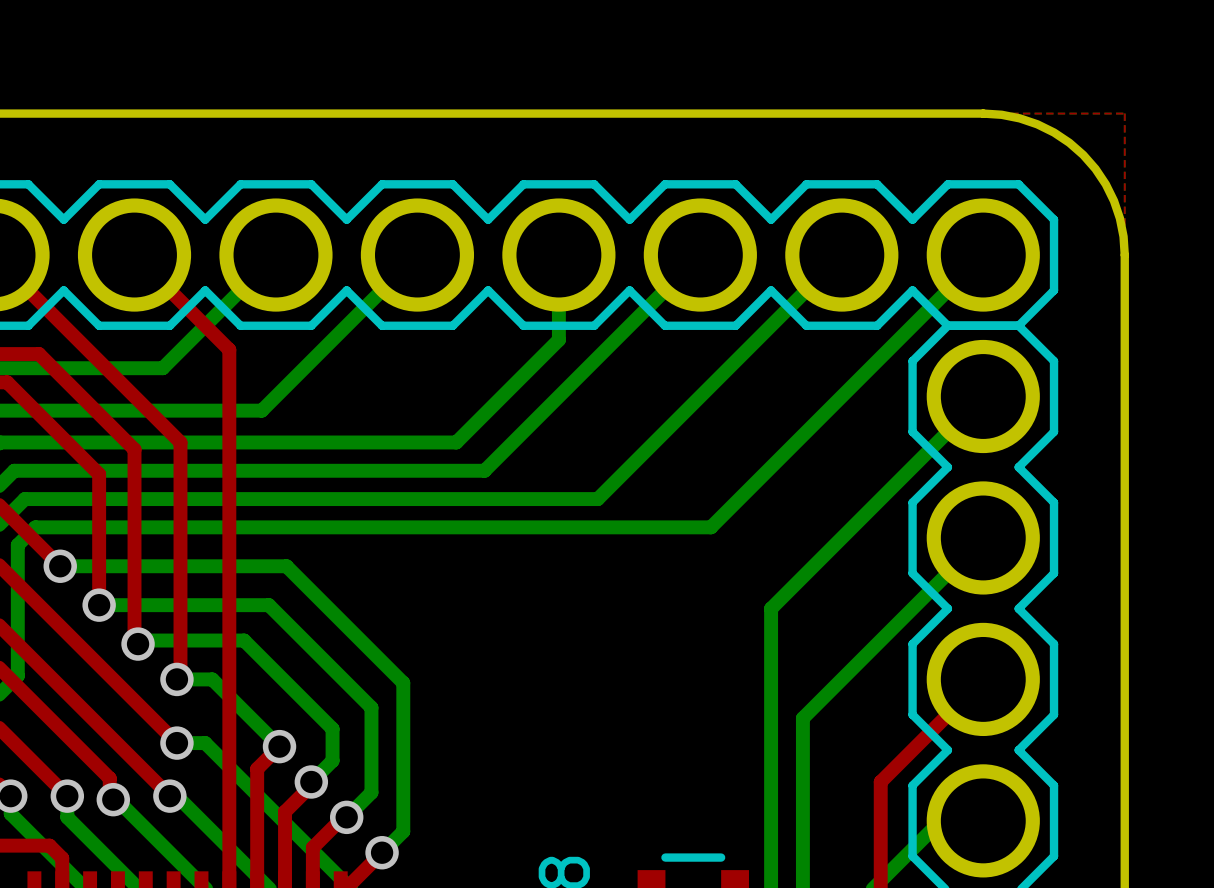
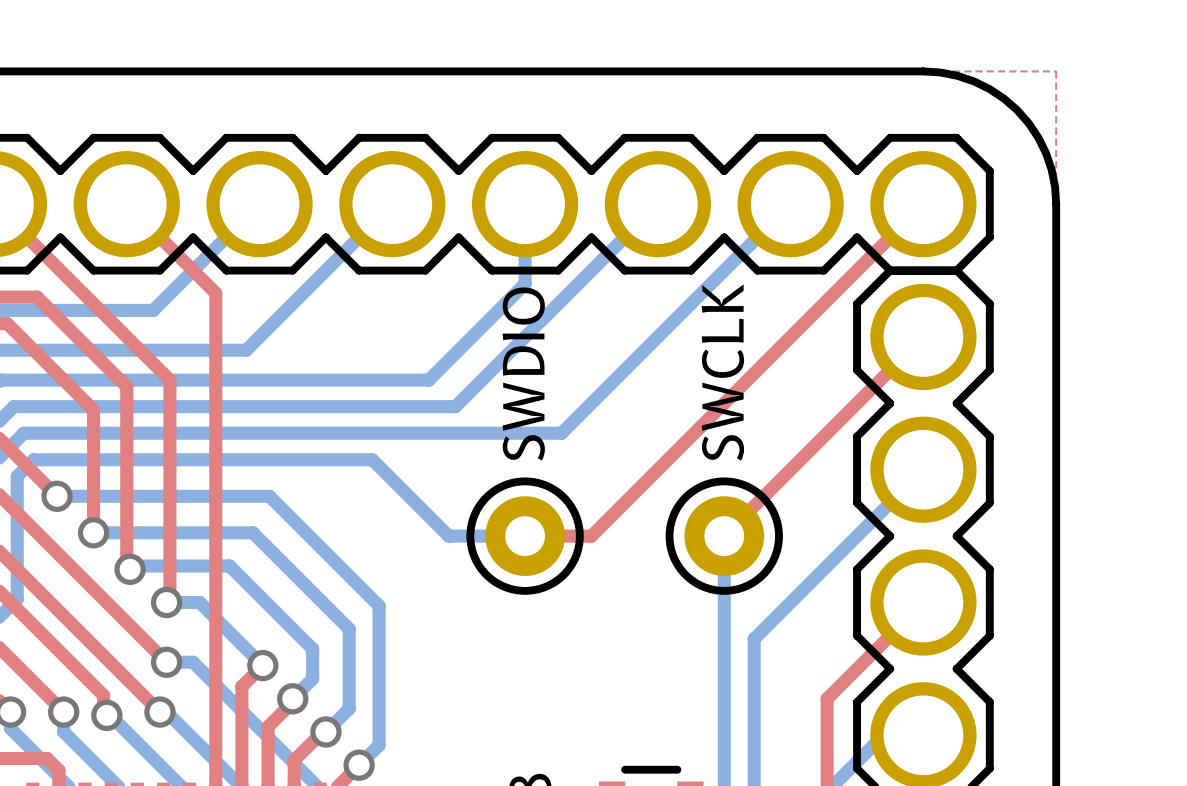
top track: none -> (923, 204) (591, 536) (525, 536)
bottom track: (983, 255) (710, 527) (396, 527) -> (525, 536) (448, 536) (372, 459)
top track: none -> (923, 336) (724, 536)
bottom track: (983, 396) (771, 608) -> none
text: none -> SWDIO (523, 374)
text: none -> SWCLK (722, 372)
part: none -> (525, 536)
part: none -> (724, 536)

